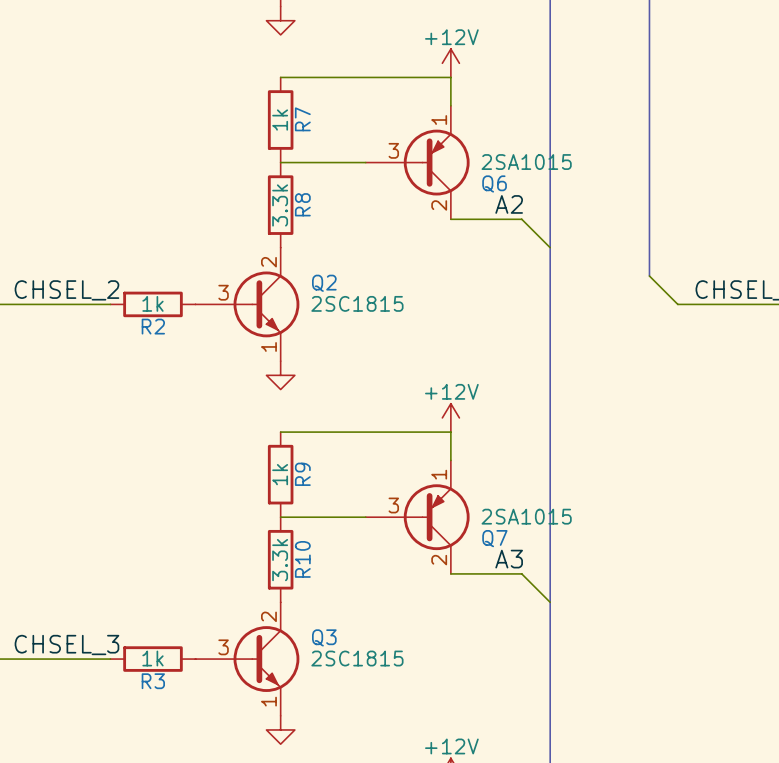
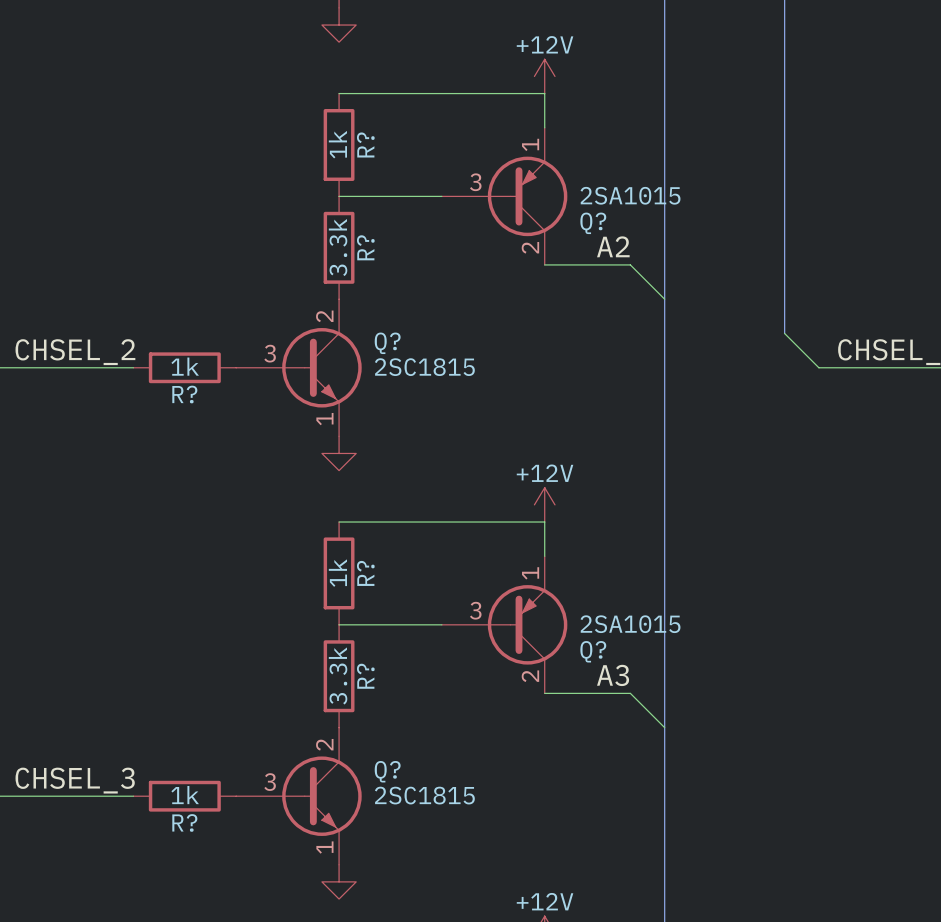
R7 name: R7 (302, 119) -> R? (365, 144)
Q6 name: Q6 (494, 183) -> Q? (593, 223)
R8 name: R8 (302, 204) -> R? (365, 247)
Q2 name: Q2 (324, 283) -> Q? (387, 343)
R2 name: R2 (153, 326) -> R? (184, 394)
R9 name: R9 (302, 474) -> R? (365, 573)
Q7 name: Q7 (494, 538) -> Q? (593, 651)
R10 name: R10 (302, 559) -> R? (365, 676)
Q3 name: Q3 (324, 637) -> Q? (387, 771)
R3 name: R3 (153, 681) -> R? (184, 822)

